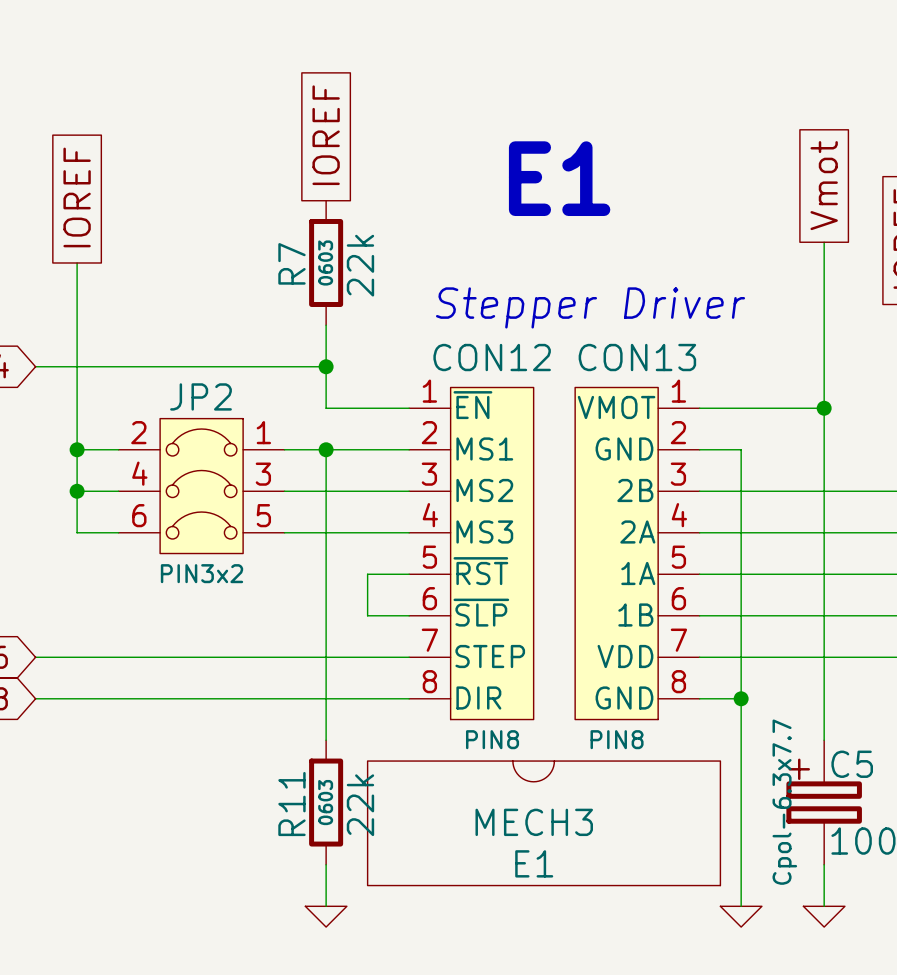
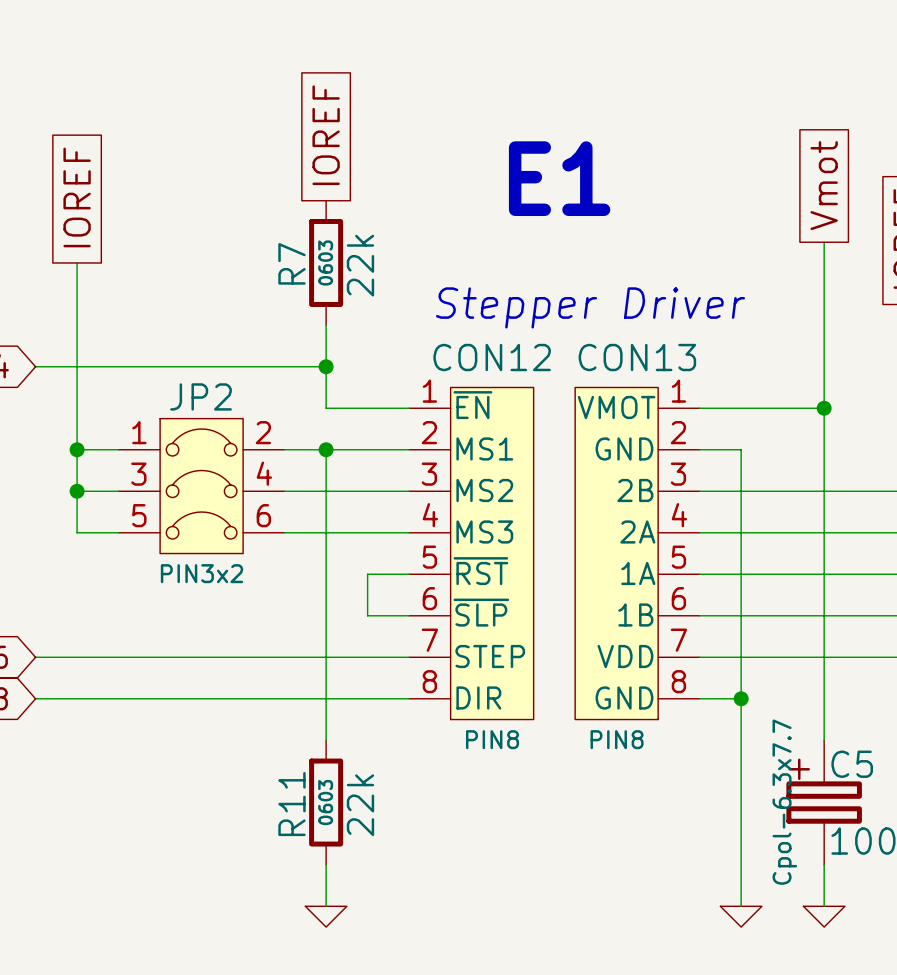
JP2 flip: as is (201, 486) -> left-right (201, 486)
MECH3: E1 (544, 823) -> none

